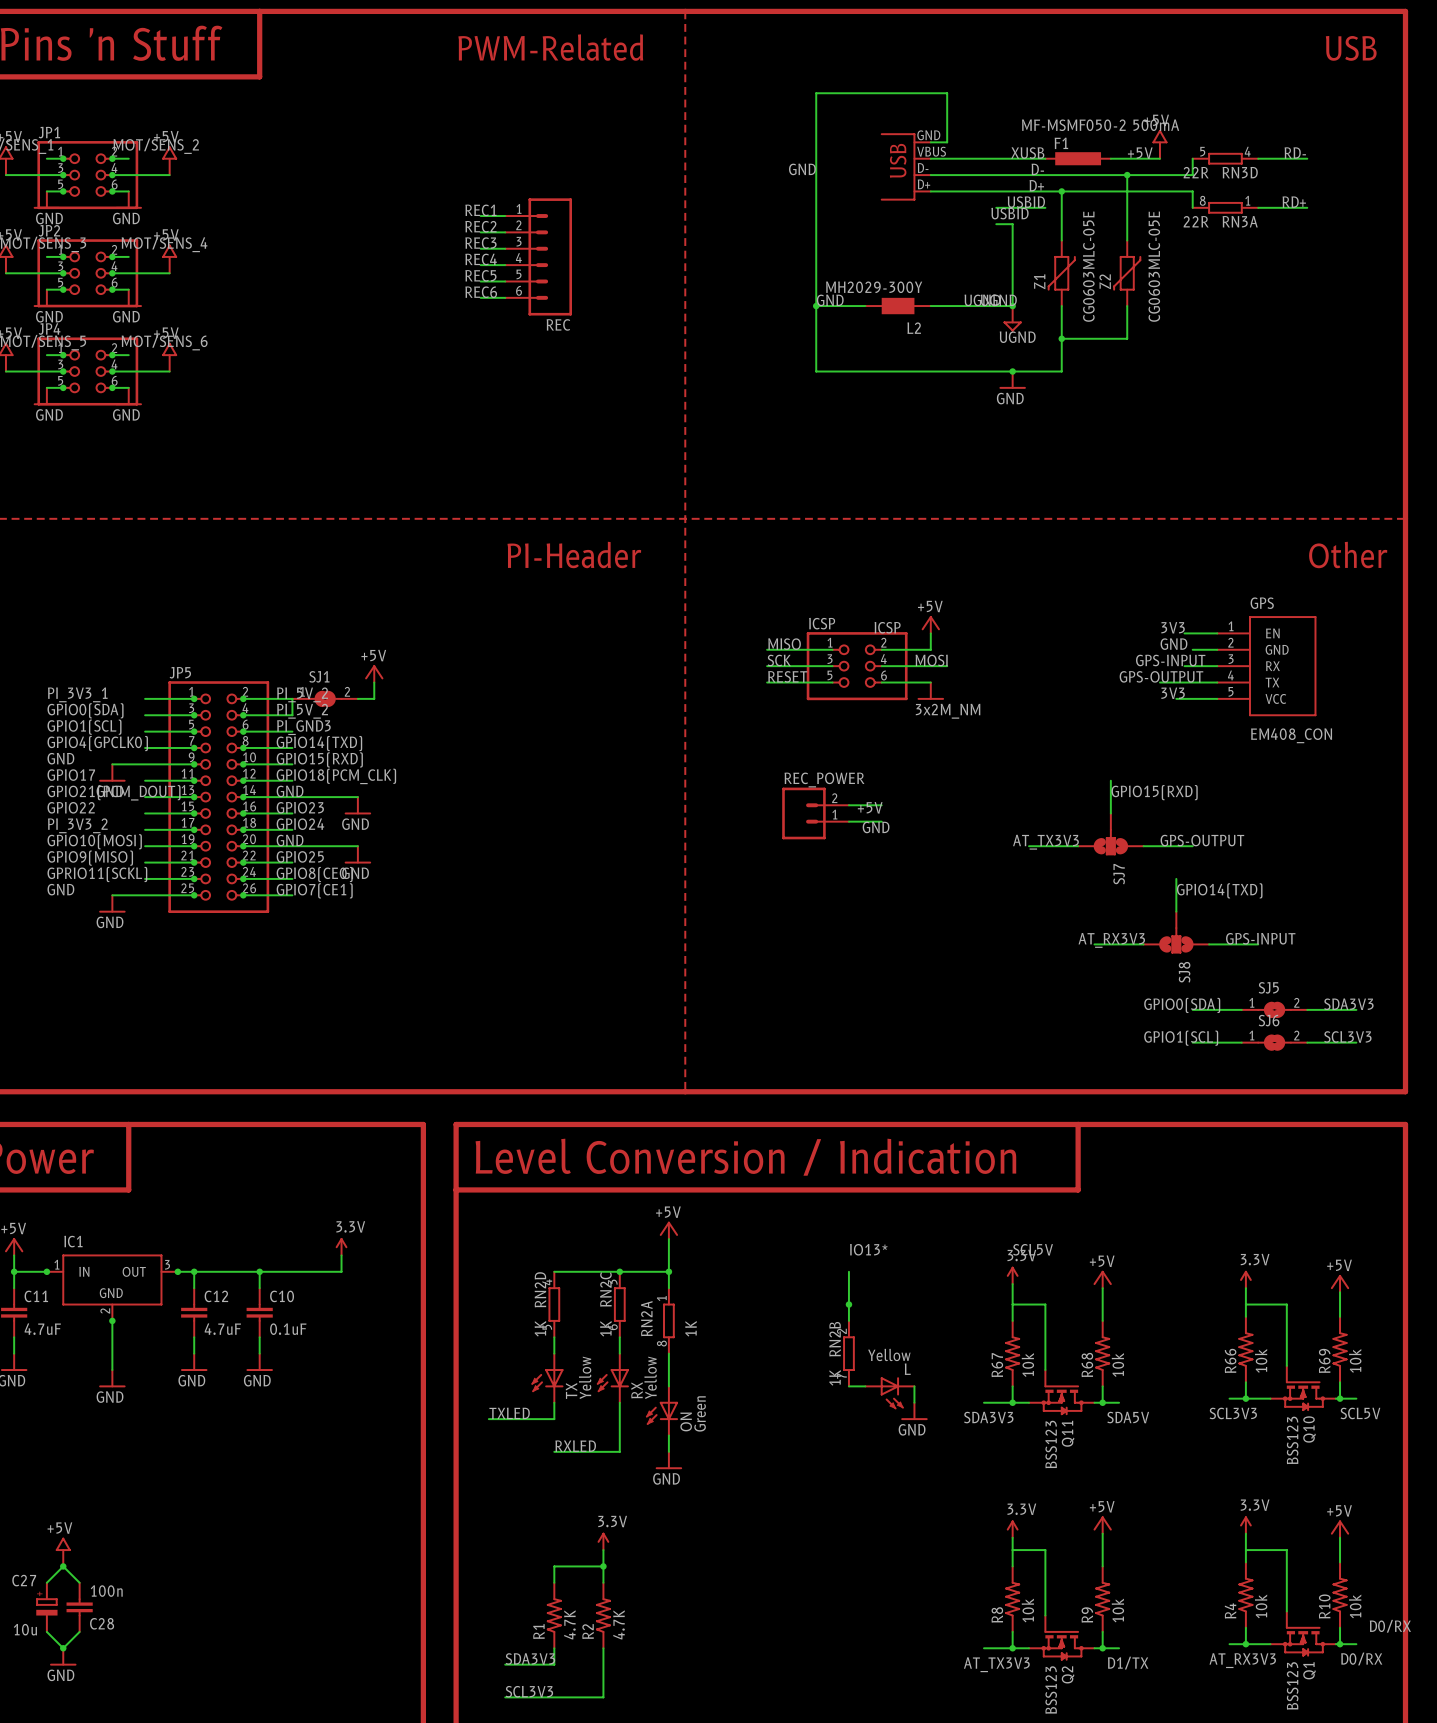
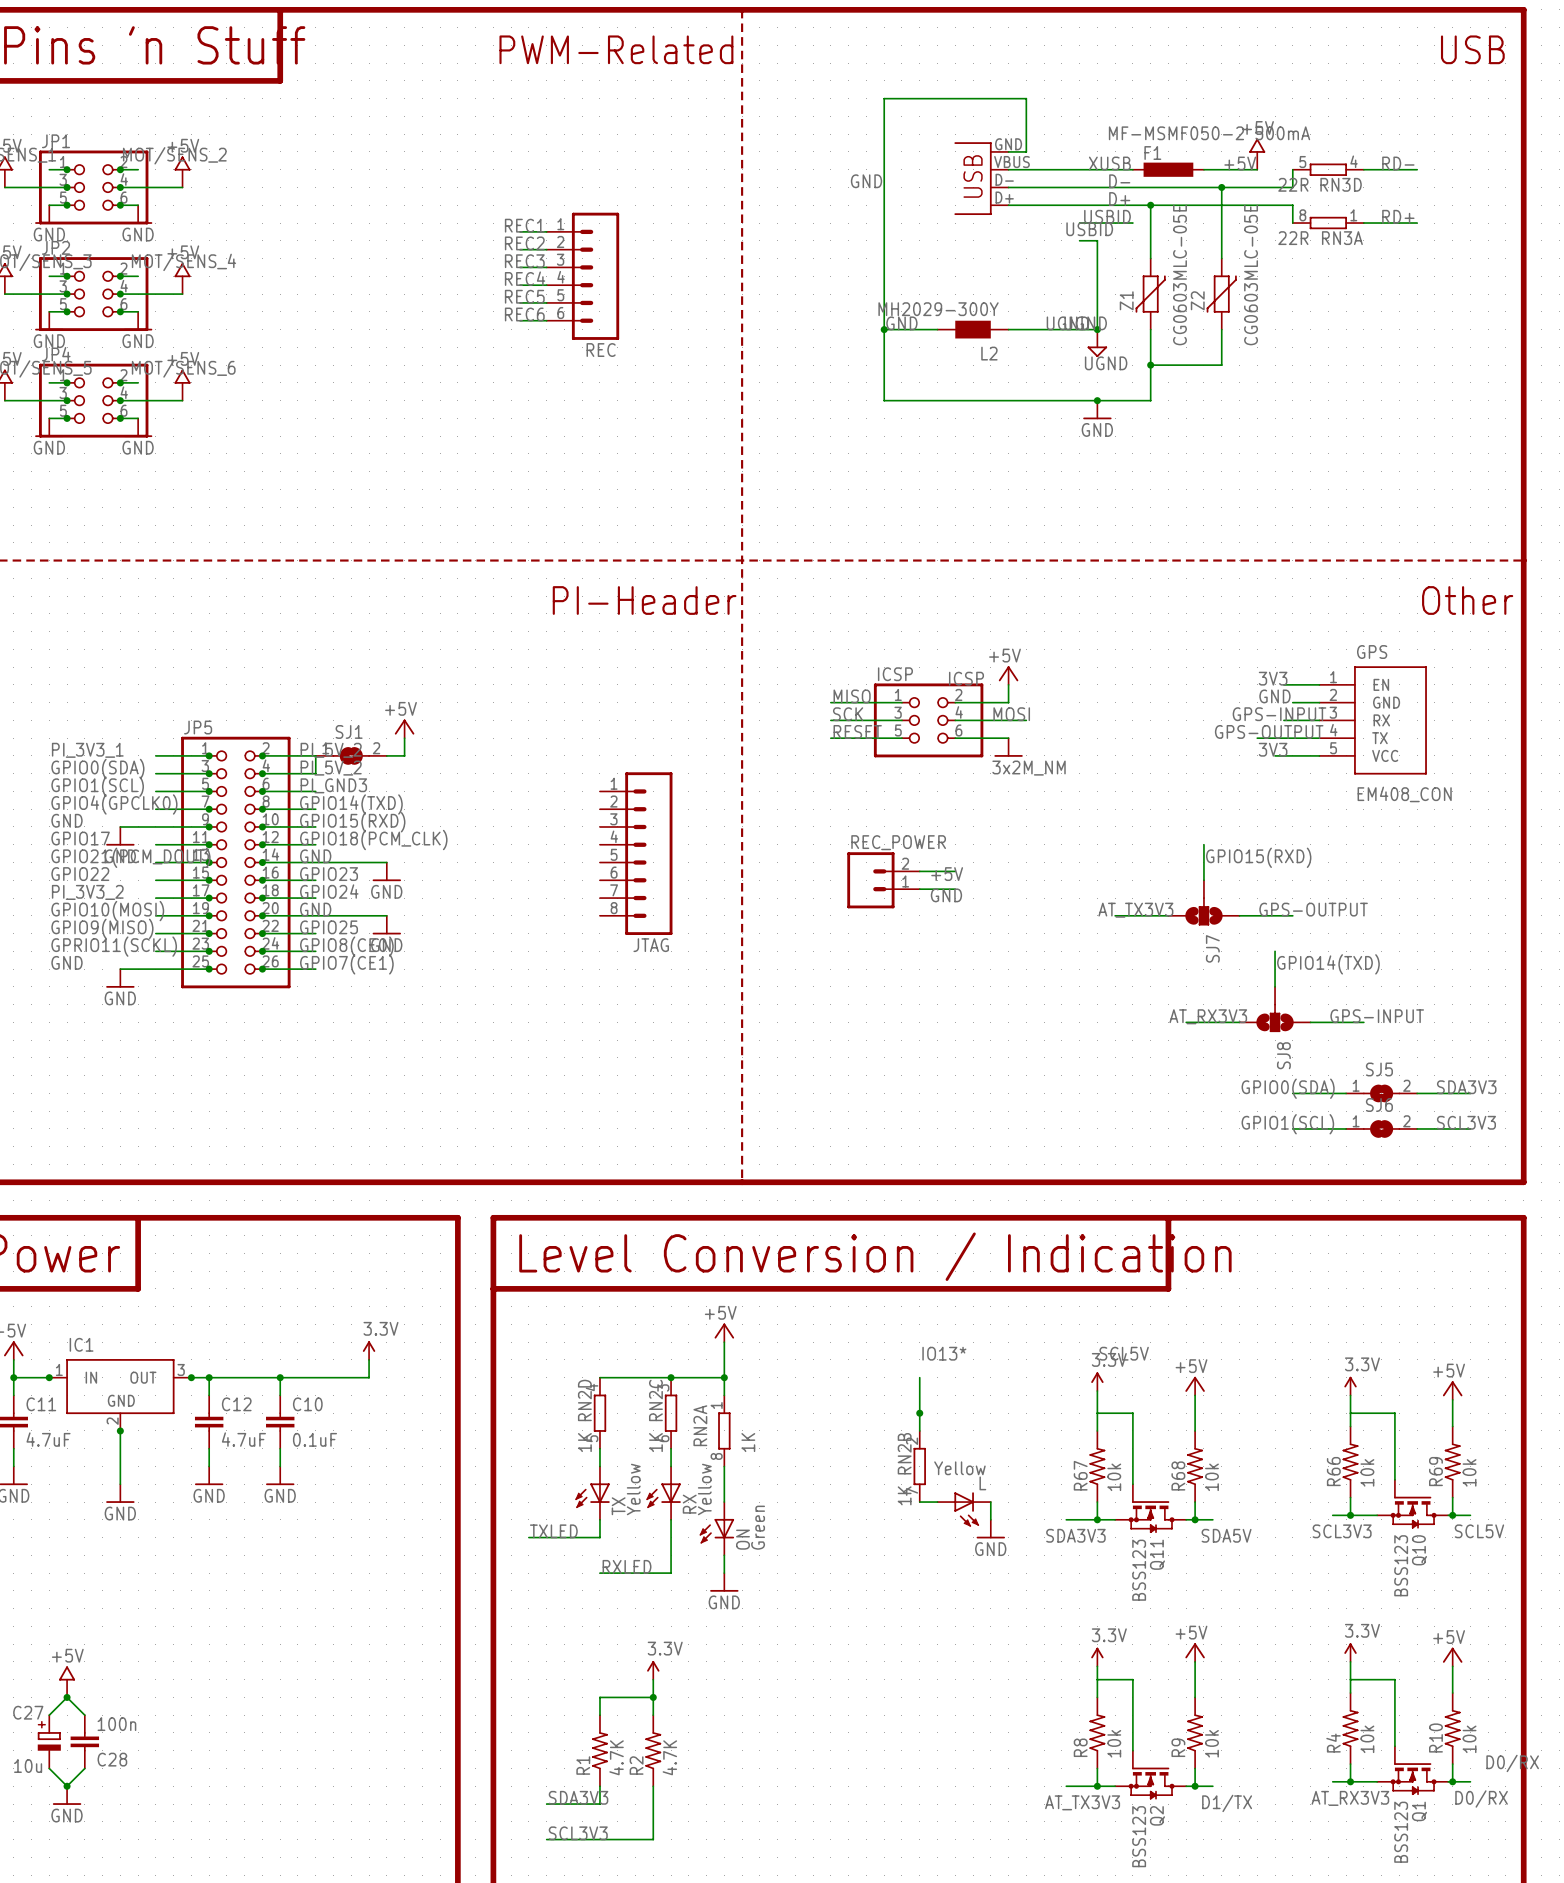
JTAG: none -> (636, 853)

